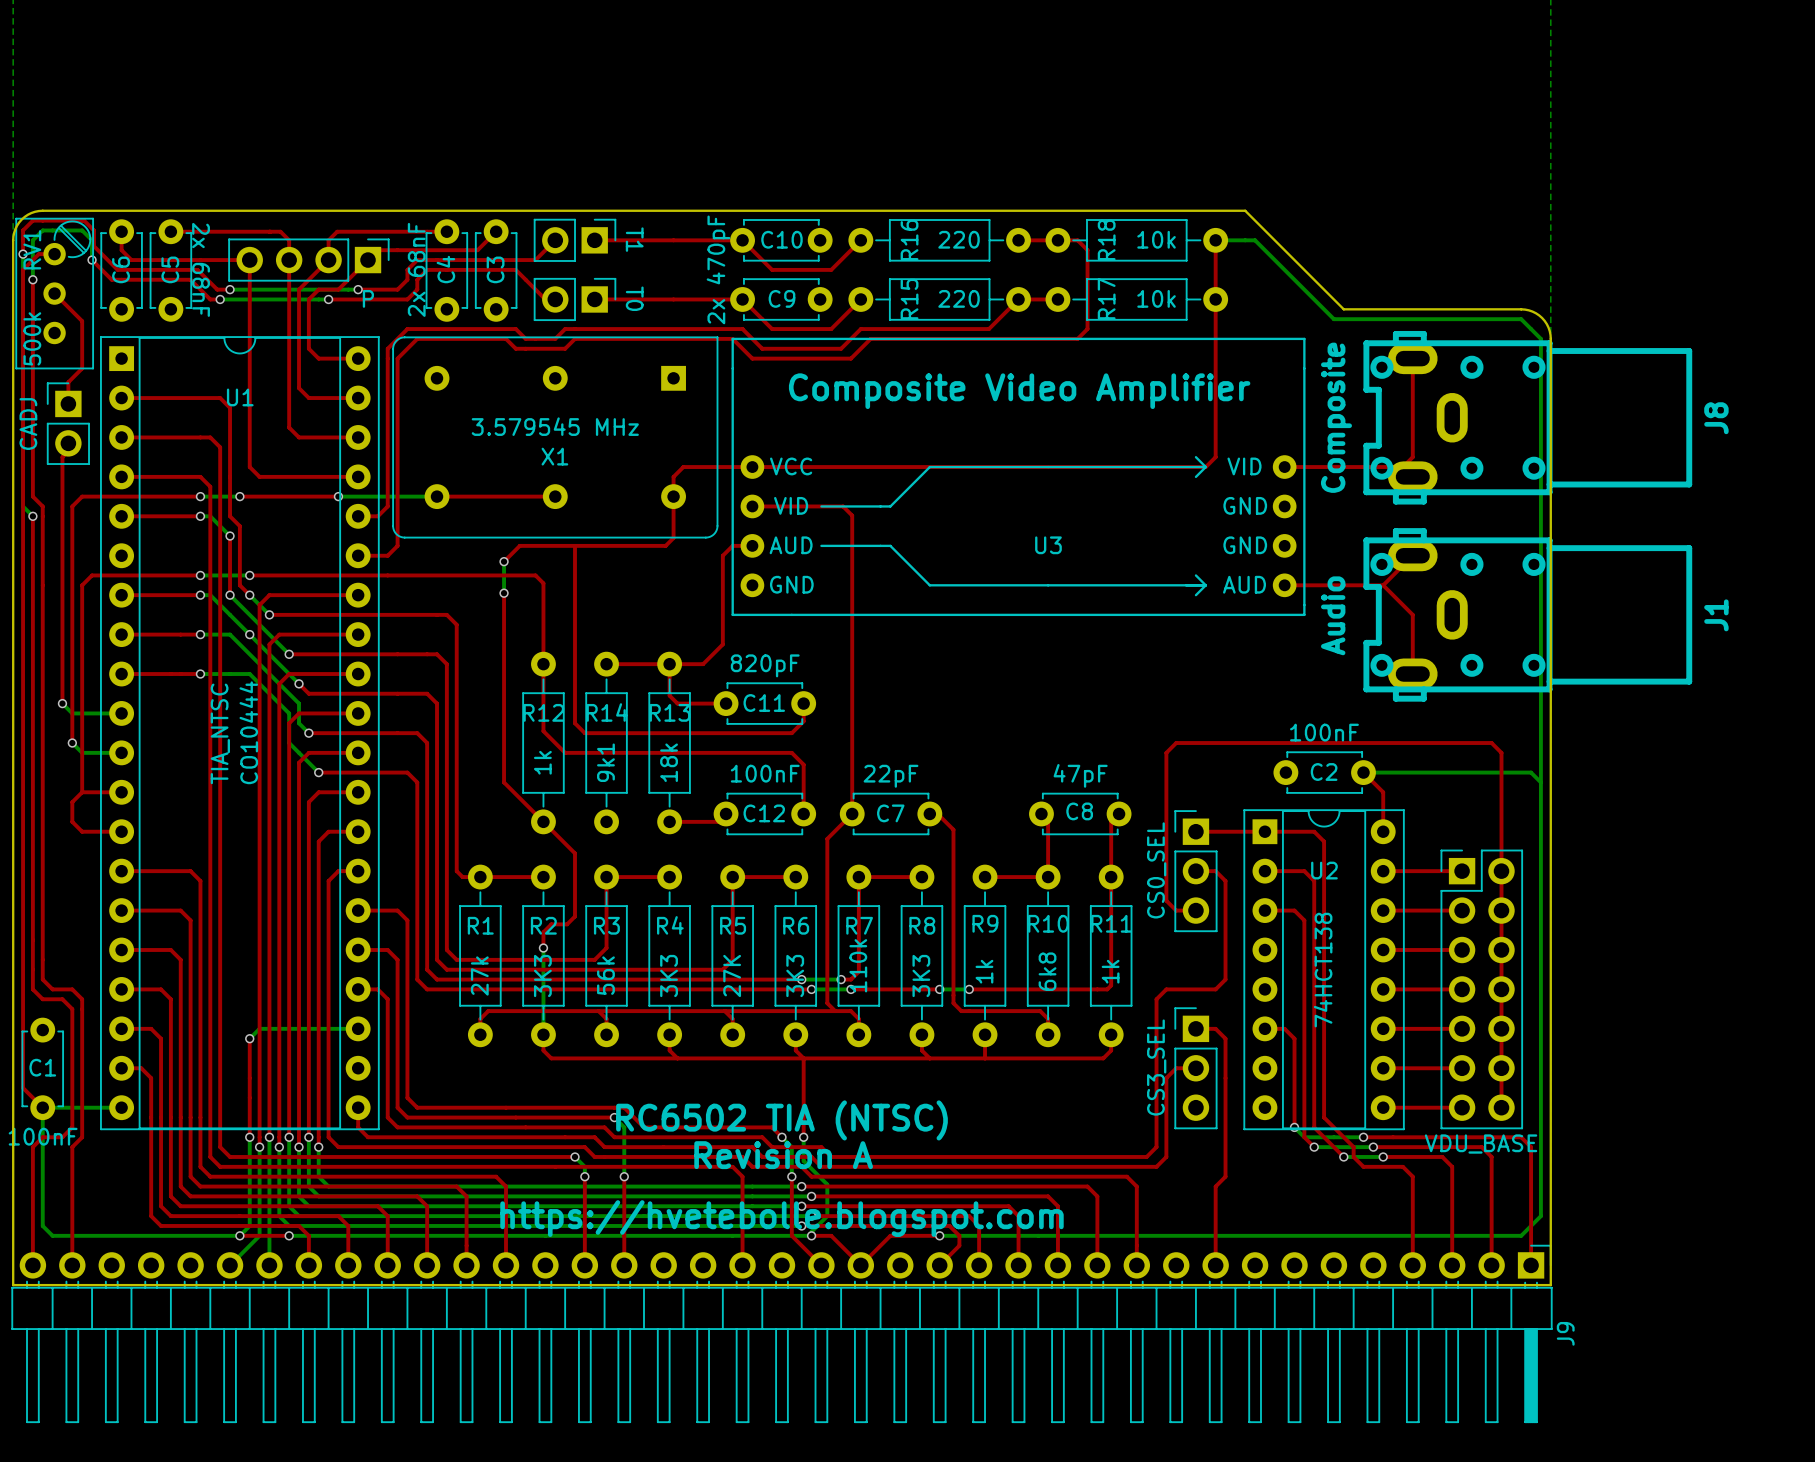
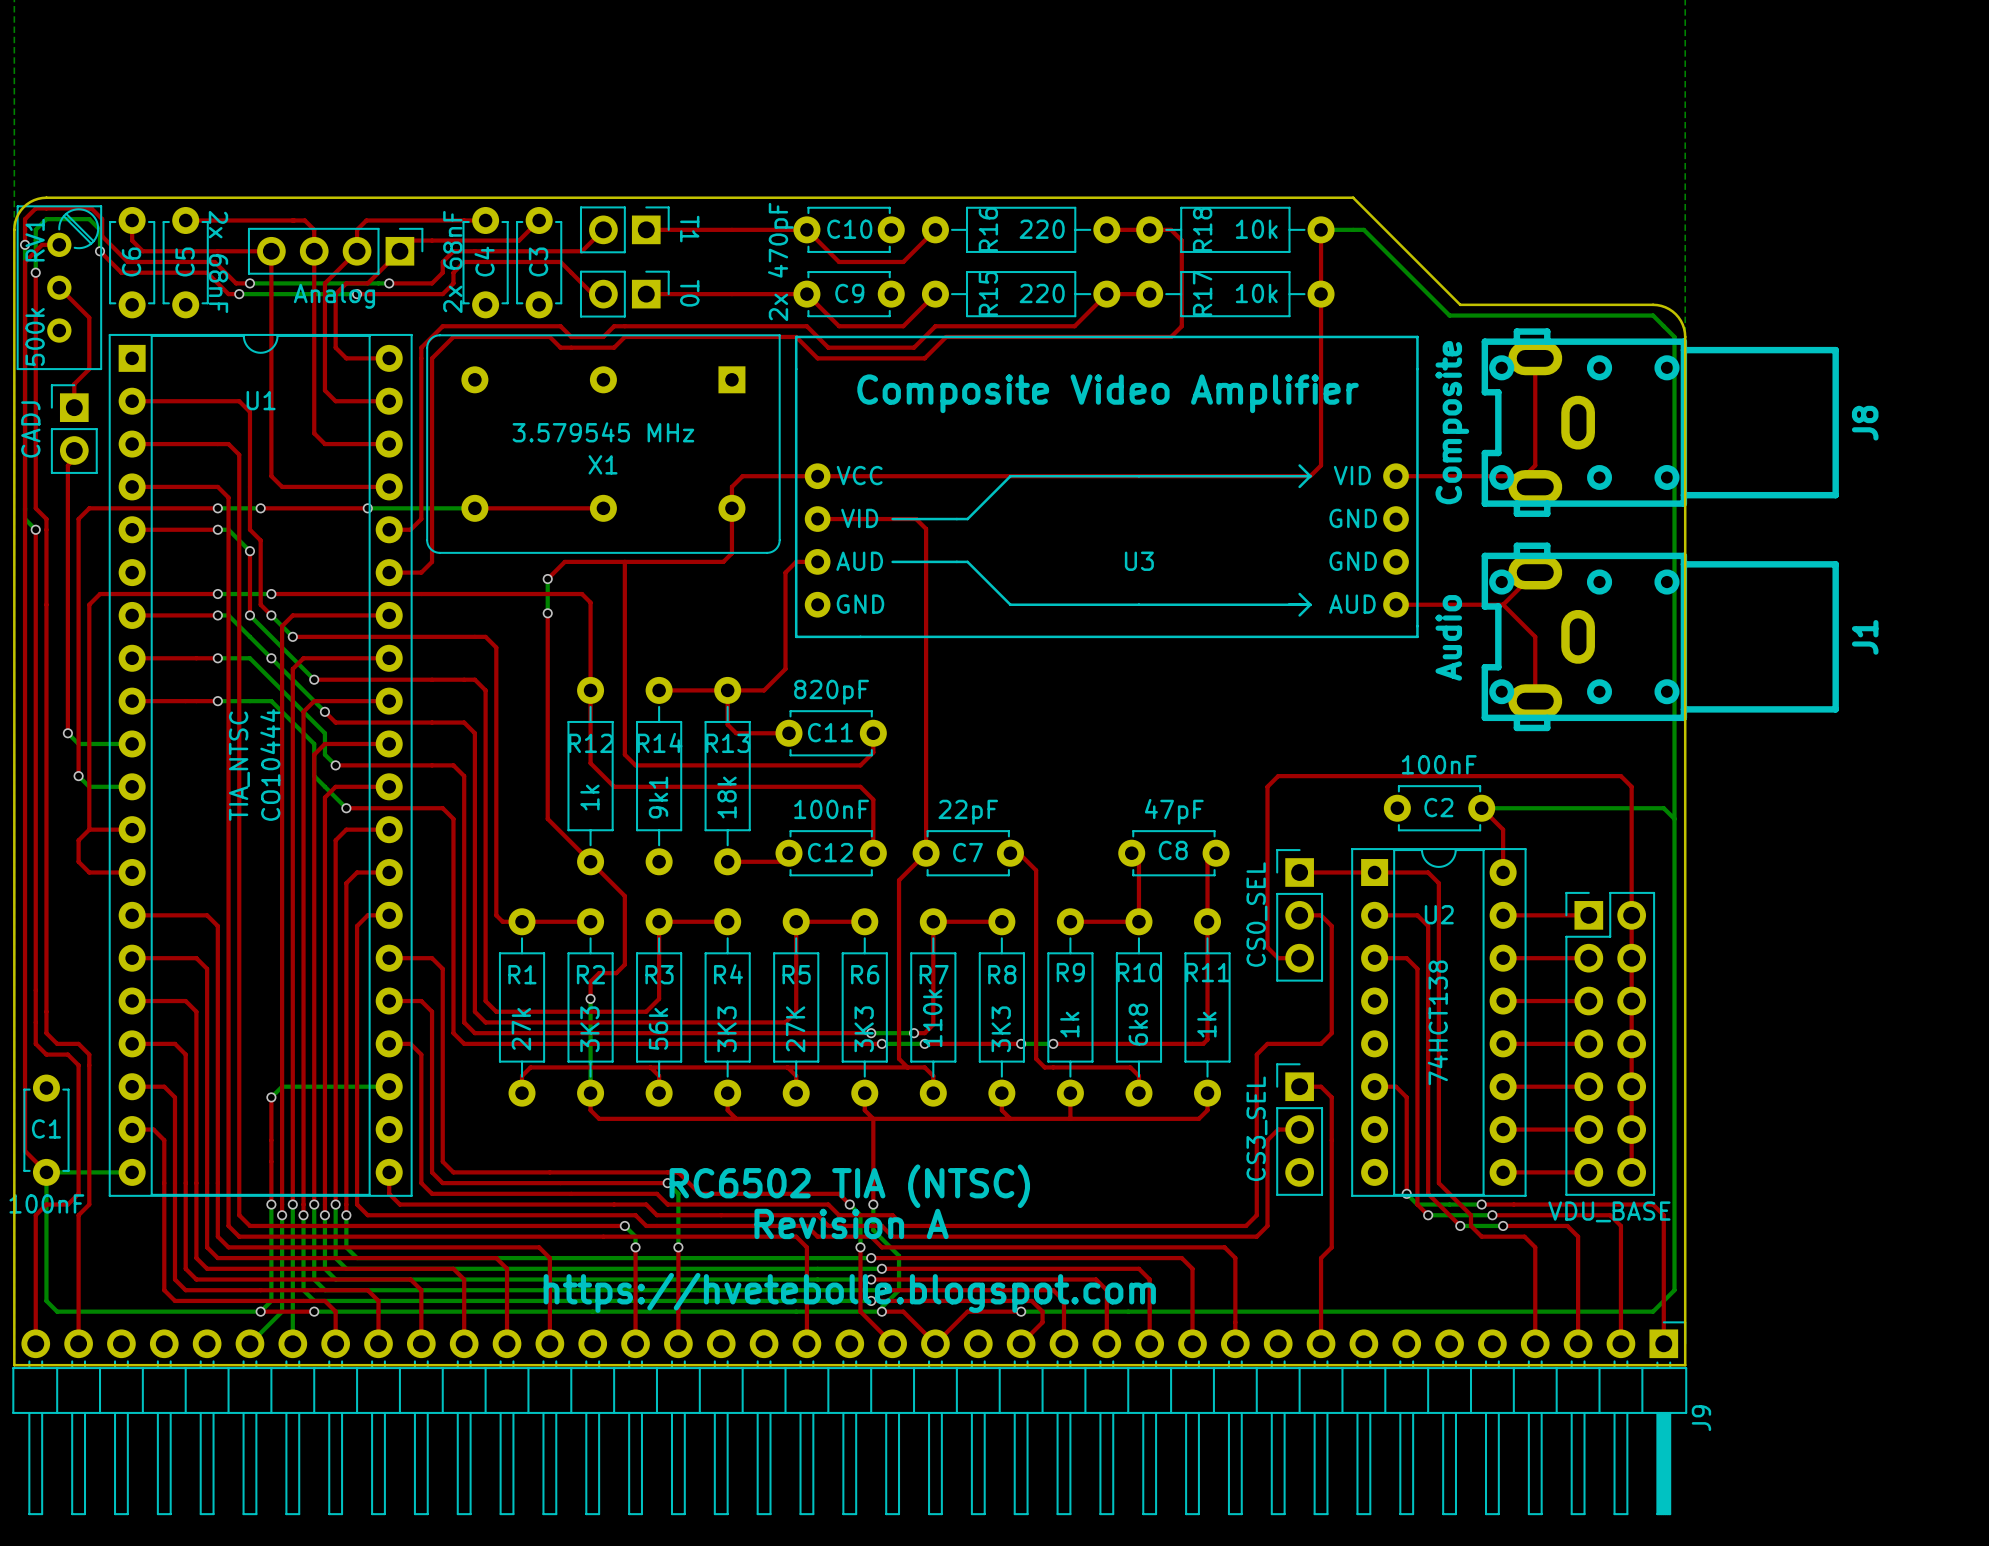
part value: P (368, 298) -> Analog (334, 296)

